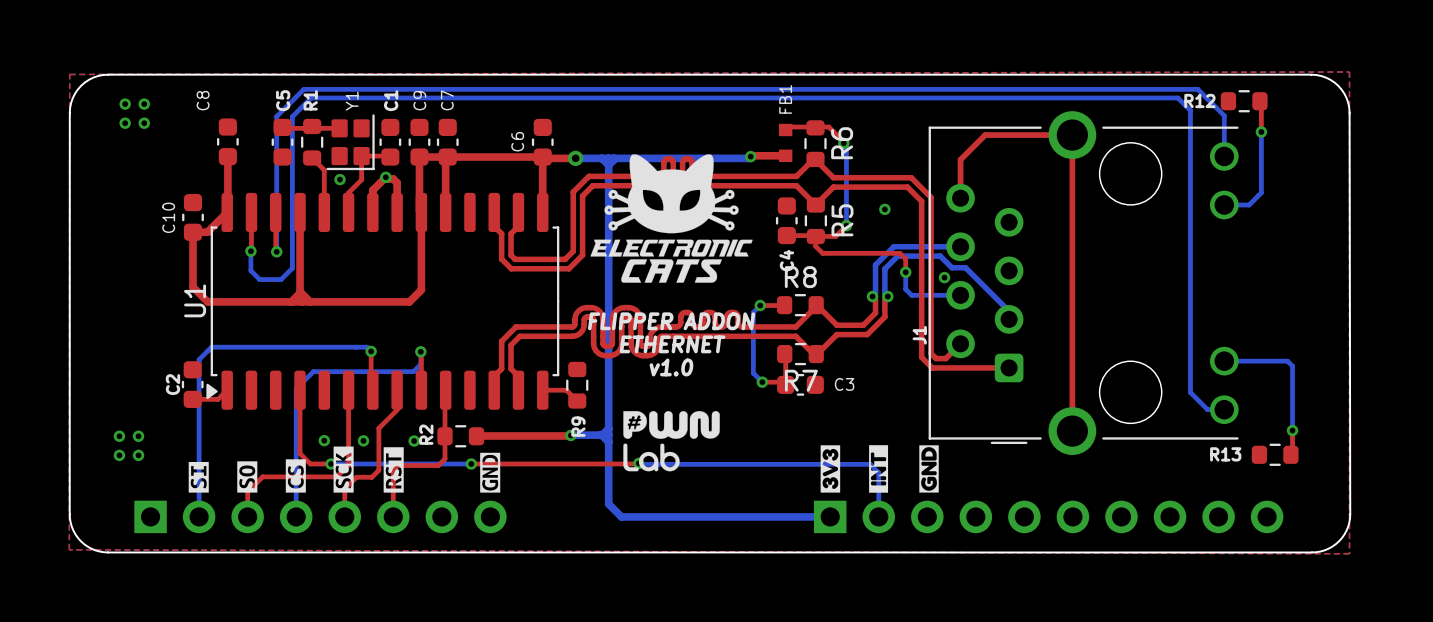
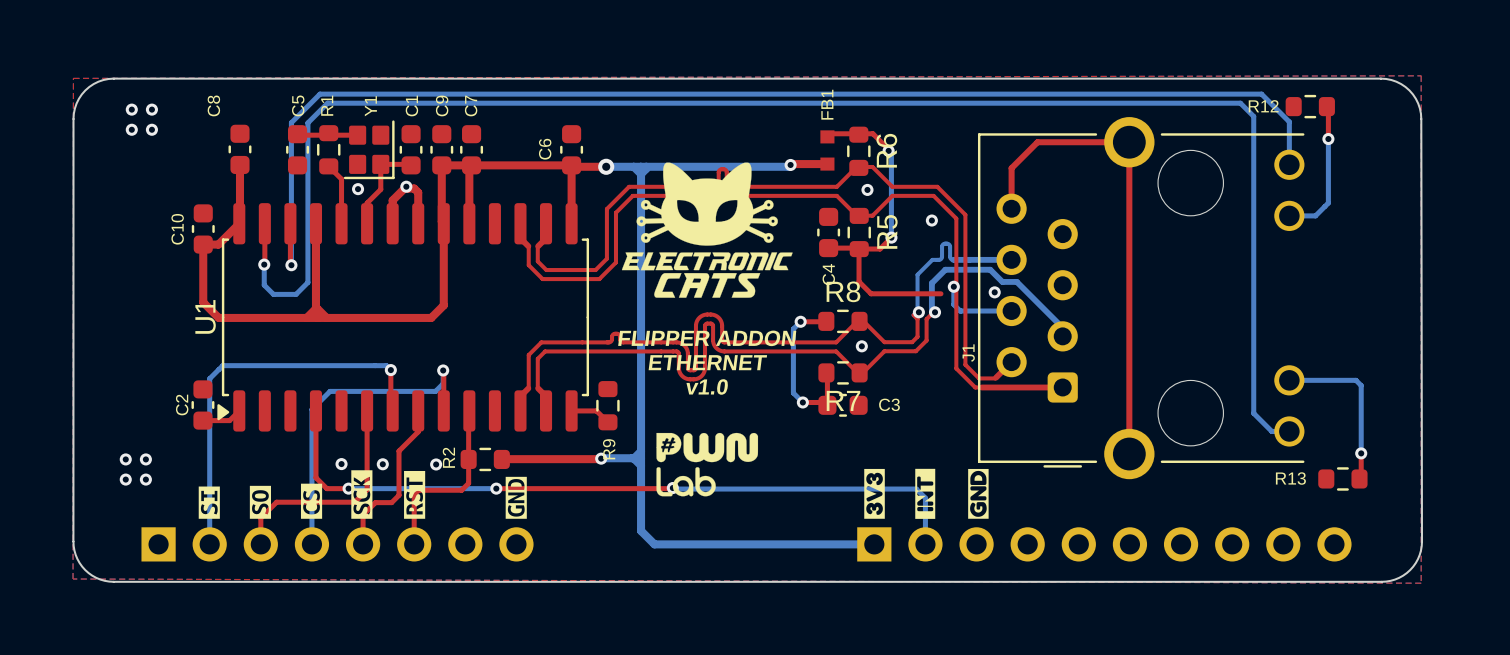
via: none -> (867, 189)
top track: (501, 233) (501, 259) (511, 268) (569, 268) (582, 255) (582, 195) (592, 185) (796, 185) (815, 204) (833, 187) (907, 187) (921, 201) (921, 357) (932, 367) -> (528, 246) (528, 265) (542, 279) (599, 279) (615, 262) (615, 212) (632, 195) (836, 195) (856, 215) (872, 215) (892, 195) (933, 195) (956, 218) (956, 368) (975, 387) (981, 387)
top track: (511, 233) (511, 255) (515, 259) (565, 259) (573, 251) (573, 192) (588, 176) (661, 176) (663, 173) (664, 161) (667, 158) (672, 160) (673, 173) (676, 176) (682, 174) (682, 161) (685, 158) (691, 160) (692, 173) (695, 176) (796, 176) (814, 158) (833, 177) (911, 177) (931, 197) (931, 353) (936, 358) (945, 358) -> (538, 246) (537, 261) (546, 270) (595, 270) (606, 258) (606, 208) (629, 186) (715, 186) (718, 184) (718, 171) (721, 169) (726, 171) (726, 184) (729, 186) (734, 185) (734, 171) (739, 169) (742, 171) (742, 184) (745, 186) (836, 186) (856, 166) (872, 166) (892, 186) (937, 186) (965, 214) (965, 364) (979, 378) (996, 377)
top track: (815, 246) (822, 253) (899, 253) (905, 259) (905, 272) -> (859, 259) (859, 281) (871, 293) (940, 293)
bottom track: (905, 246) (893, 246) (875, 265) (875, 293) (872, 296) -> (953, 259) (950, 257) (949, 245) (944, 243) (941, 258) (932, 259) (917, 274) (917, 311) (913, 315)
top track: (872, 296) (875, 299) (875, 313) (863, 325) (836, 325) (817, 305) (795, 326) (741, 326) (738, 323) (737, 314) (733, 312) (727, 314) (726, 323) (723, 326) (716, 325) (714, 314) (708, 312) (704, 315) (702, 325) (696, 326) (692, 323) (691, 314) (684, 312) (681, 315) (678, 326) (660, 327) (654, 329) (650, 335) (649, 344) (647, 346) (640, 344) (640, 318) (634, 309) (623, 307) (615, 312) (612, 318) (612, 344) (605, 346) (603, 343) (601, 313) (594, 308) (584, 307) (576, 313) (572, 326) (516, 326) (501, 341) (501, 368) -> (913, 315) (917, 319) (917, 336) (912, 342) (884, 342) (860, 318) (836, 342) (724, 342) (722, 340) (722, 324) (719, 318) (713, 314) (704, 314) (699, 317) (696, 324) (695, 367) (693, 370) (688, 368) (686, 348) (678, 342) (622, 342) (616, 333) (612, 334) (609, 342) (541, 342) (528, 355) (528, 388)
top track: (887, 296) (884, 299) (884, 316) (867, 334) (836, 334) (815, 355) (795, 336) (661, 336) (655, 352) (649, 355) (640, 355) (635, 352) (631, 347) (631, 319) (628, 316) (621, 319) (619, 349) (613, 354) (603, 355) (597, 352) (593, 346) (593, 318) (587, 316) (584, 318) (582, 330) (574, 336) (519, 336) (511, 345) (511, 368) -> (930, 315) (926, 319) (926, 340) (915, 351) (884, 351) (860, 375) (836, 351) (720, 350) (713, 343) (712, 324) (707, 323) (705, 325) (704, 369) (702, 374) (698, 378) (687, 378) (681, 374) (677, 351) (545, 351) (537, 358) (538, 388)
via: none -> (861, 346)

